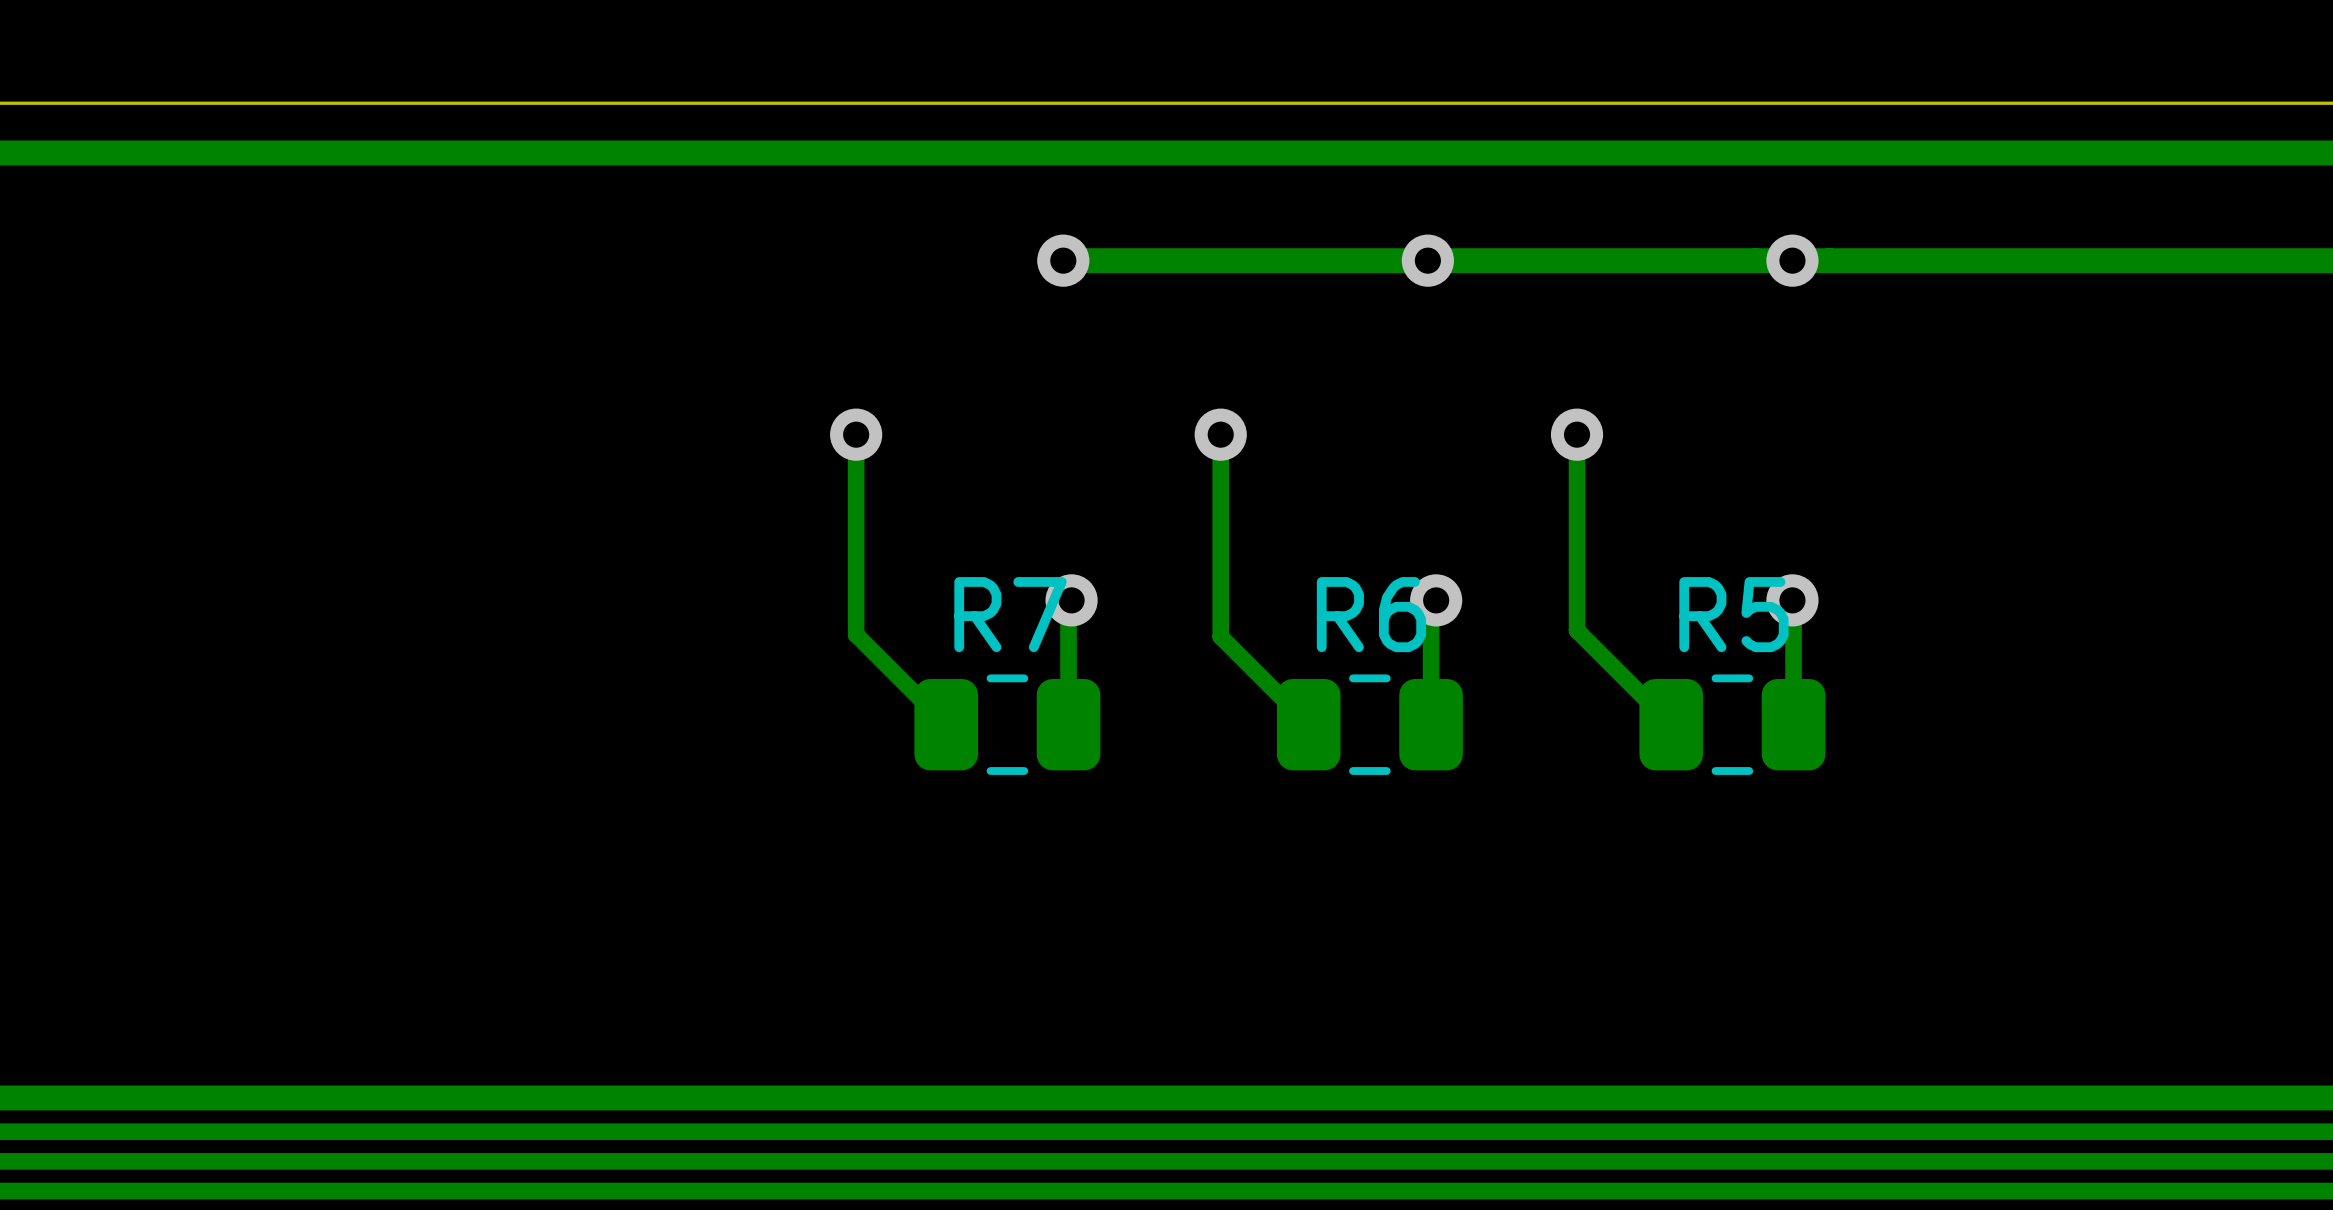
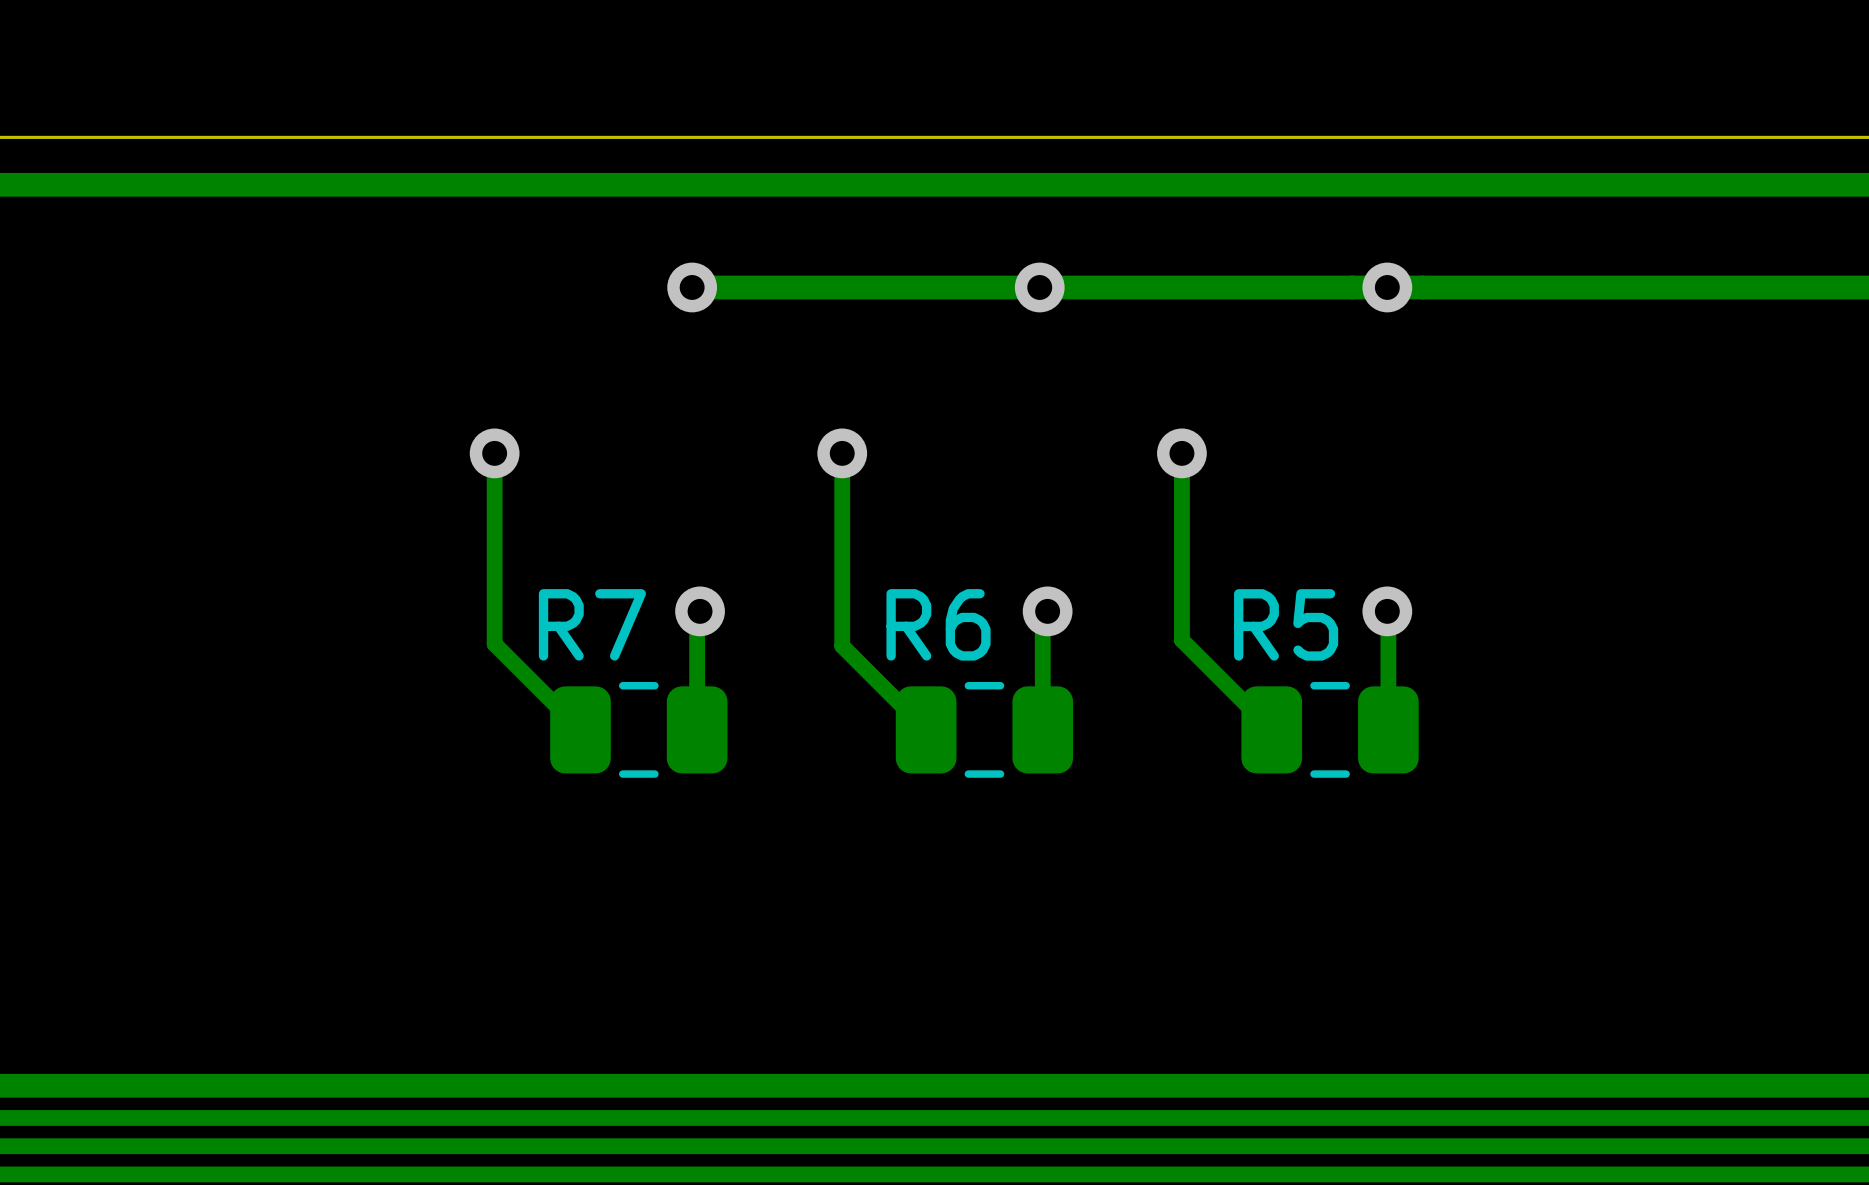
R7 name position: R7 (1010, 614) -> R7 (592, 624)
R6 name position: R6 (1371, 614) -> R6 (938, 624)
R5 name position: R5 (1733, 614) -> R5 (1286, 624)

